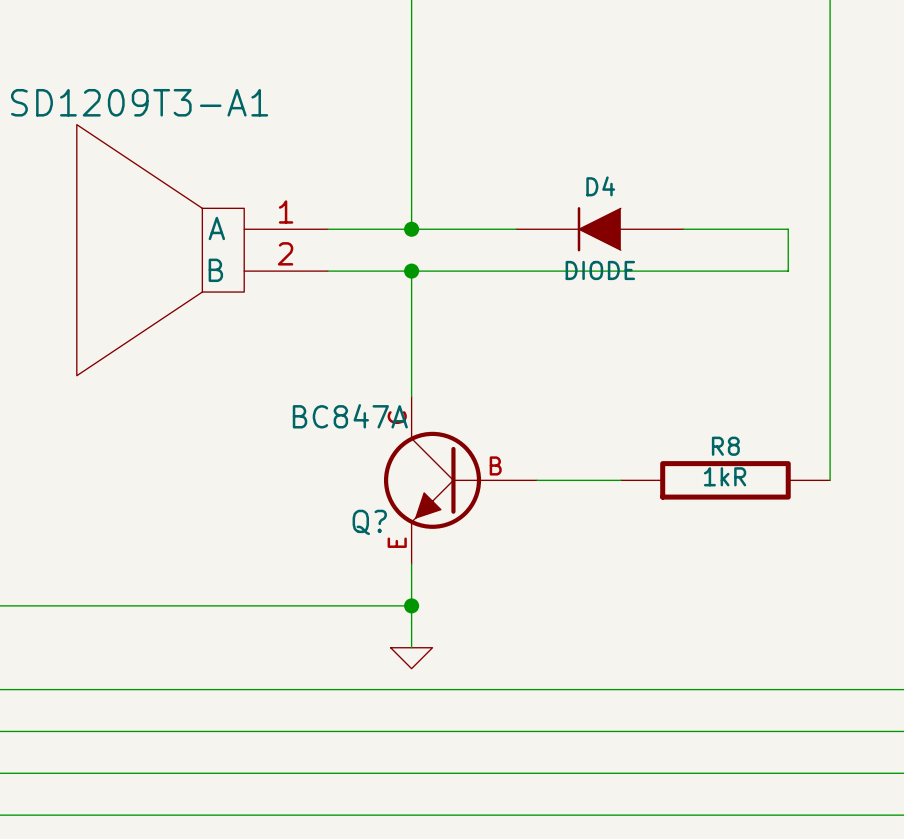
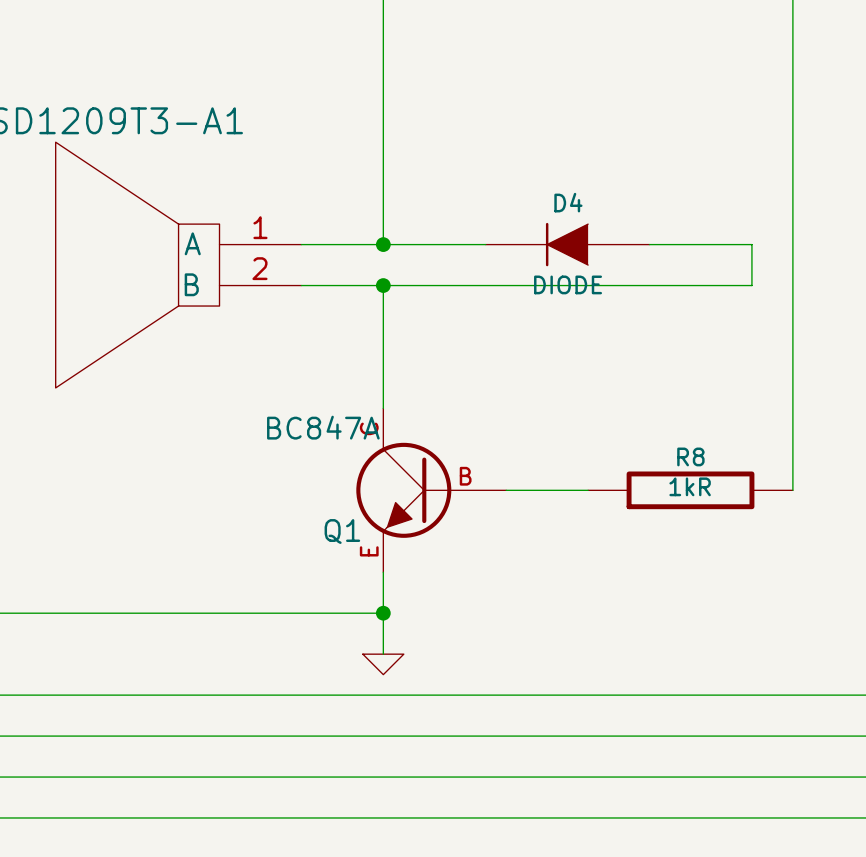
Q? name: Q? (369, 522) -> Q1 (342, 531)

